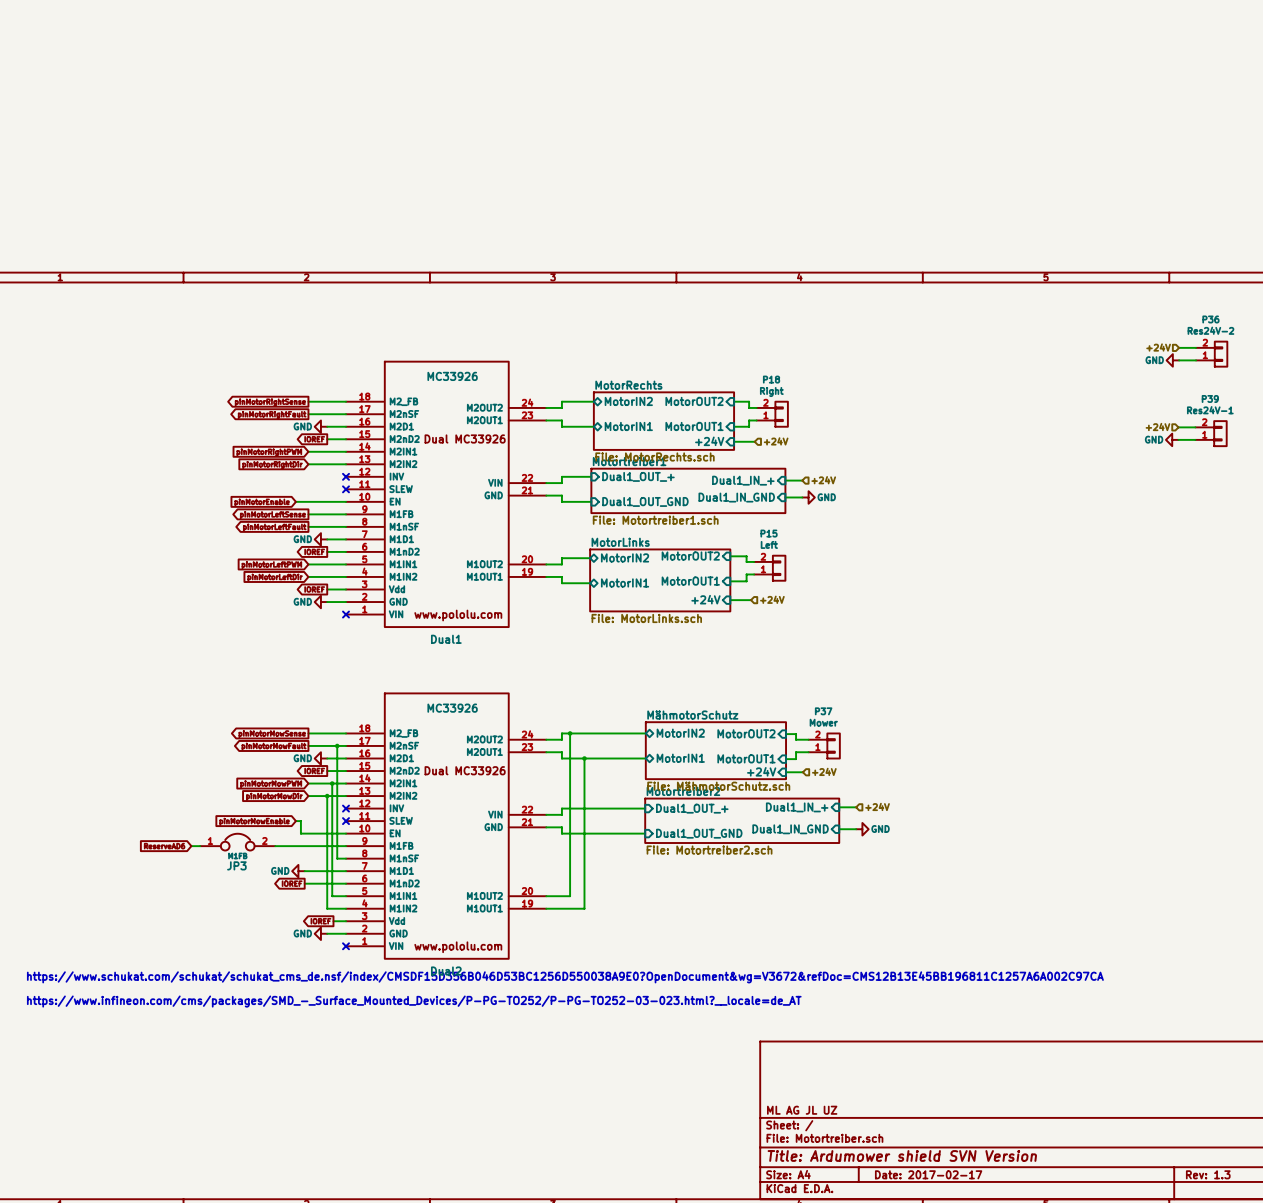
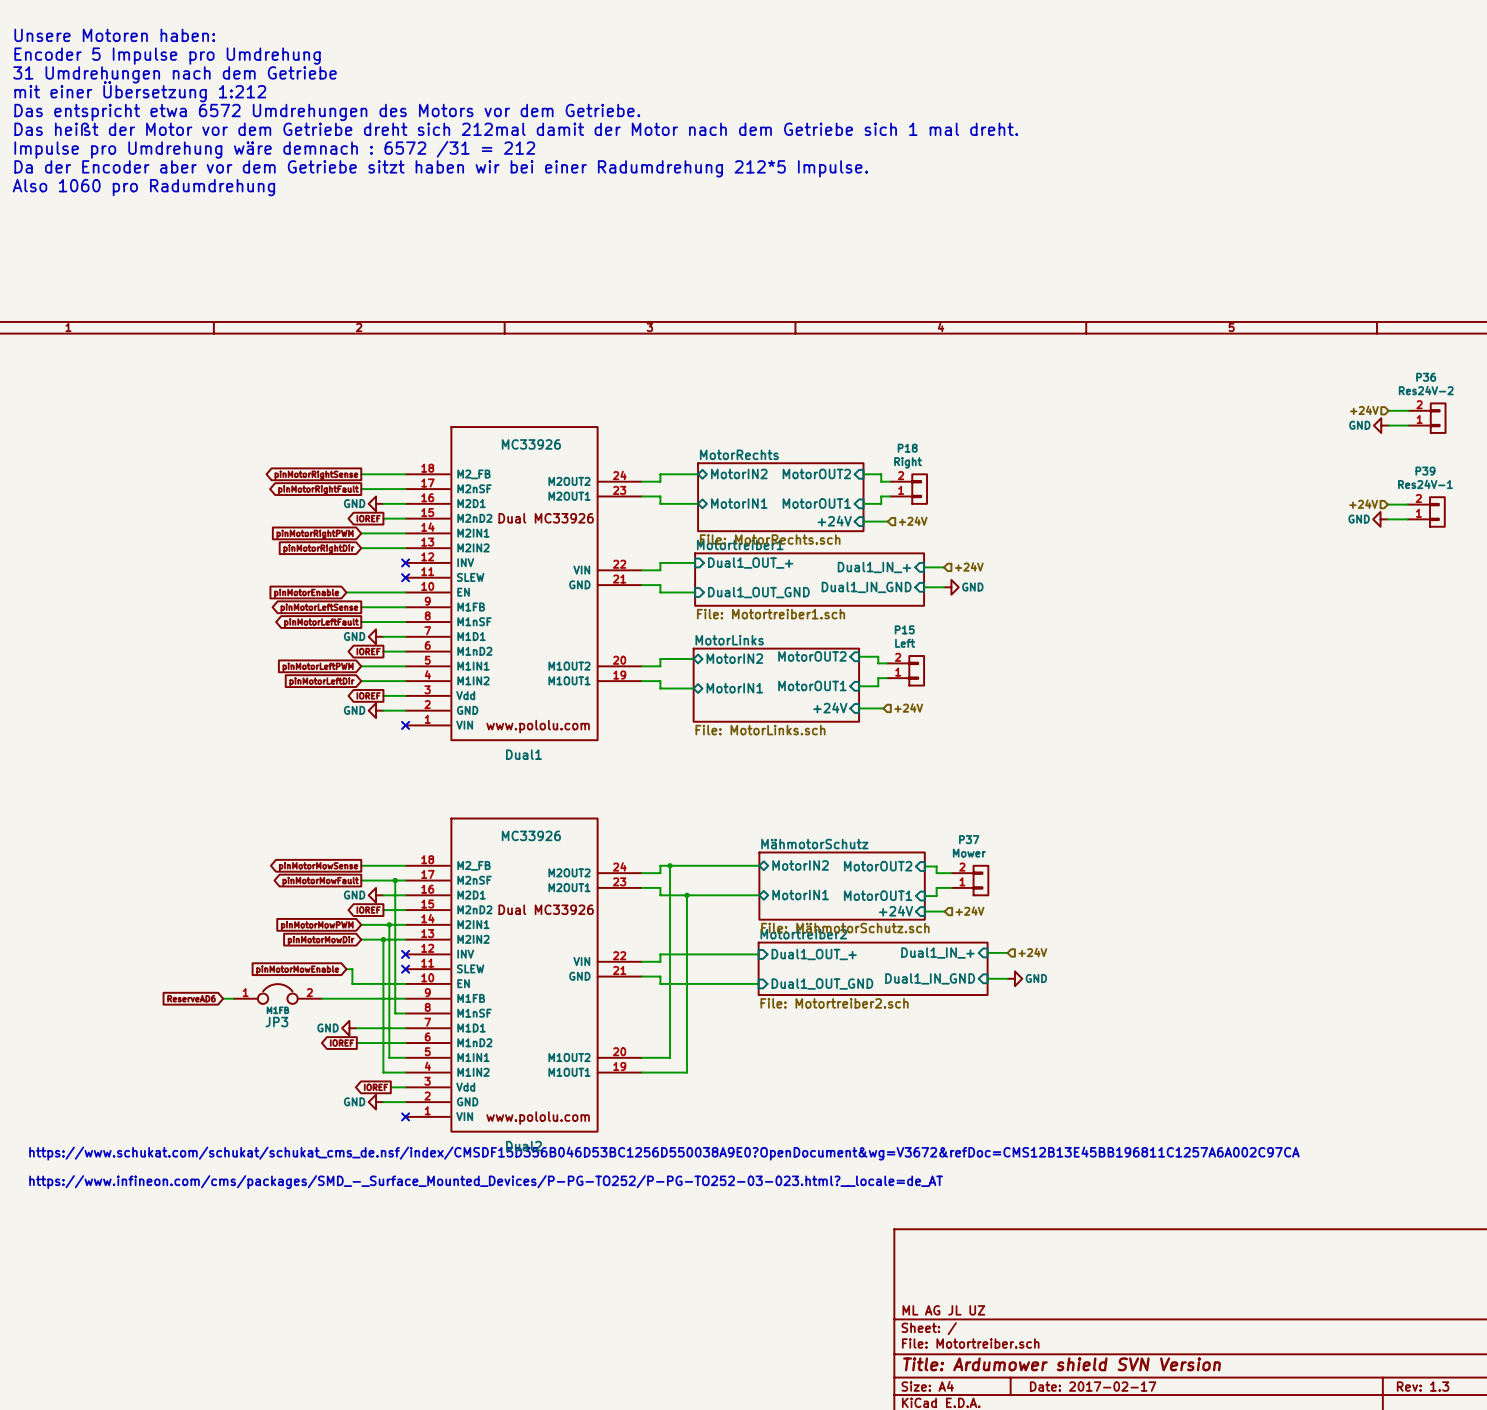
text: none -> Unsere Motoren haben: (114, 35)
text: none -> Encoder 5 Impulse pro Umdrehung (167, 56)
text: none -> 31 Umdrehungen nach dem Getriebe (175, 74)
text: none -> mit einer Übersetzung 1:212 (140, 91)
text: none -> Das entspricht etwa 6572 Umdrehungen des Motors vor dem Getriebe. (327, 112)
text: none -> Das heißt der Motor vor dem Getriebe dreht sich 212mal damit der Motor nach dem Getriebe sich 1 mal dreht. (516, 129)
text: none -> Impulse pro Umdrehung wäre demnach : 6572 /31 = 212 (274, 149)
text: none -> Da der Encoder aber vor dem Getriebe sitzt haben wir bei einer Radumdrehung 212*5 Impulse. (441, 168)
text: none -> Also 1060 pro Radumdrehung (143, 187)

